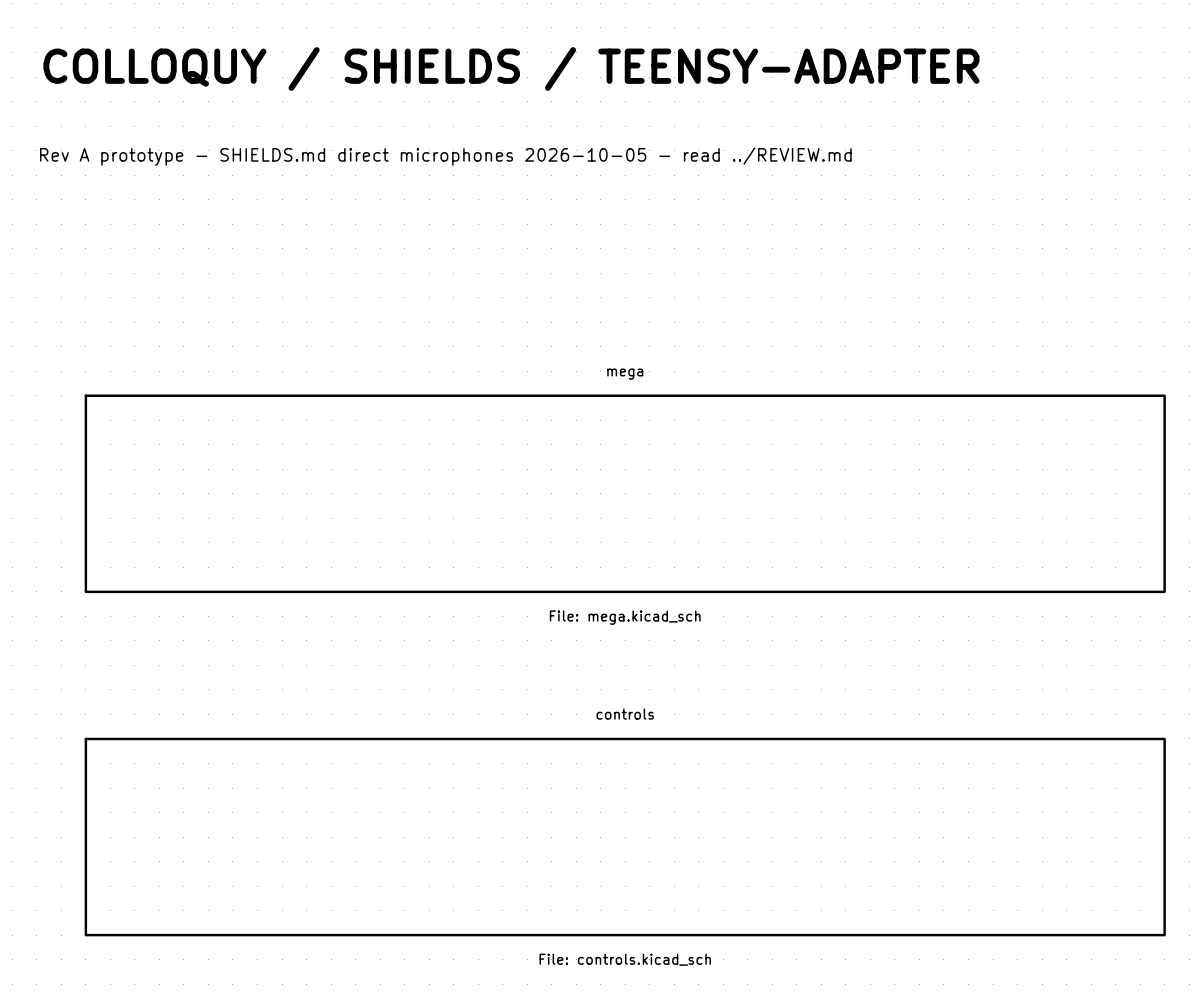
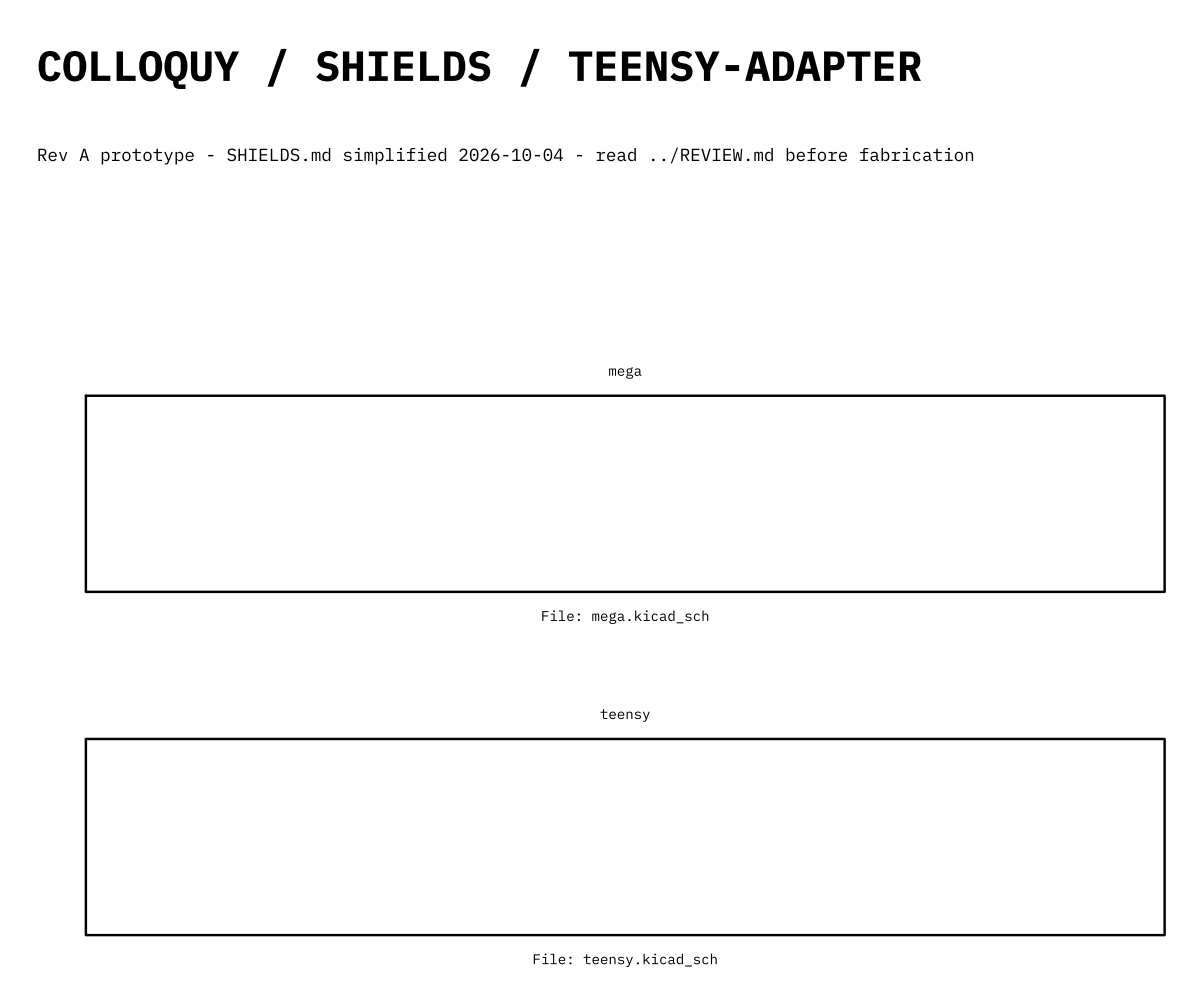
text: Rev A prototype - SHIELDS.md direct microphones 2026-10-05 - read ../REVIEW.md (445, 156) -> Rev A prototype - SHIELDS.md simplified 2026-10-04 - read ../REVIEW.md before fabrication (505, 156)
sheet controls name: controls (625, 714) -> teensy (625, 715)
sheet controls value: File: controls.kicad_sch (625, 959) -> File: teensy.kicad_sch (625, 960)

